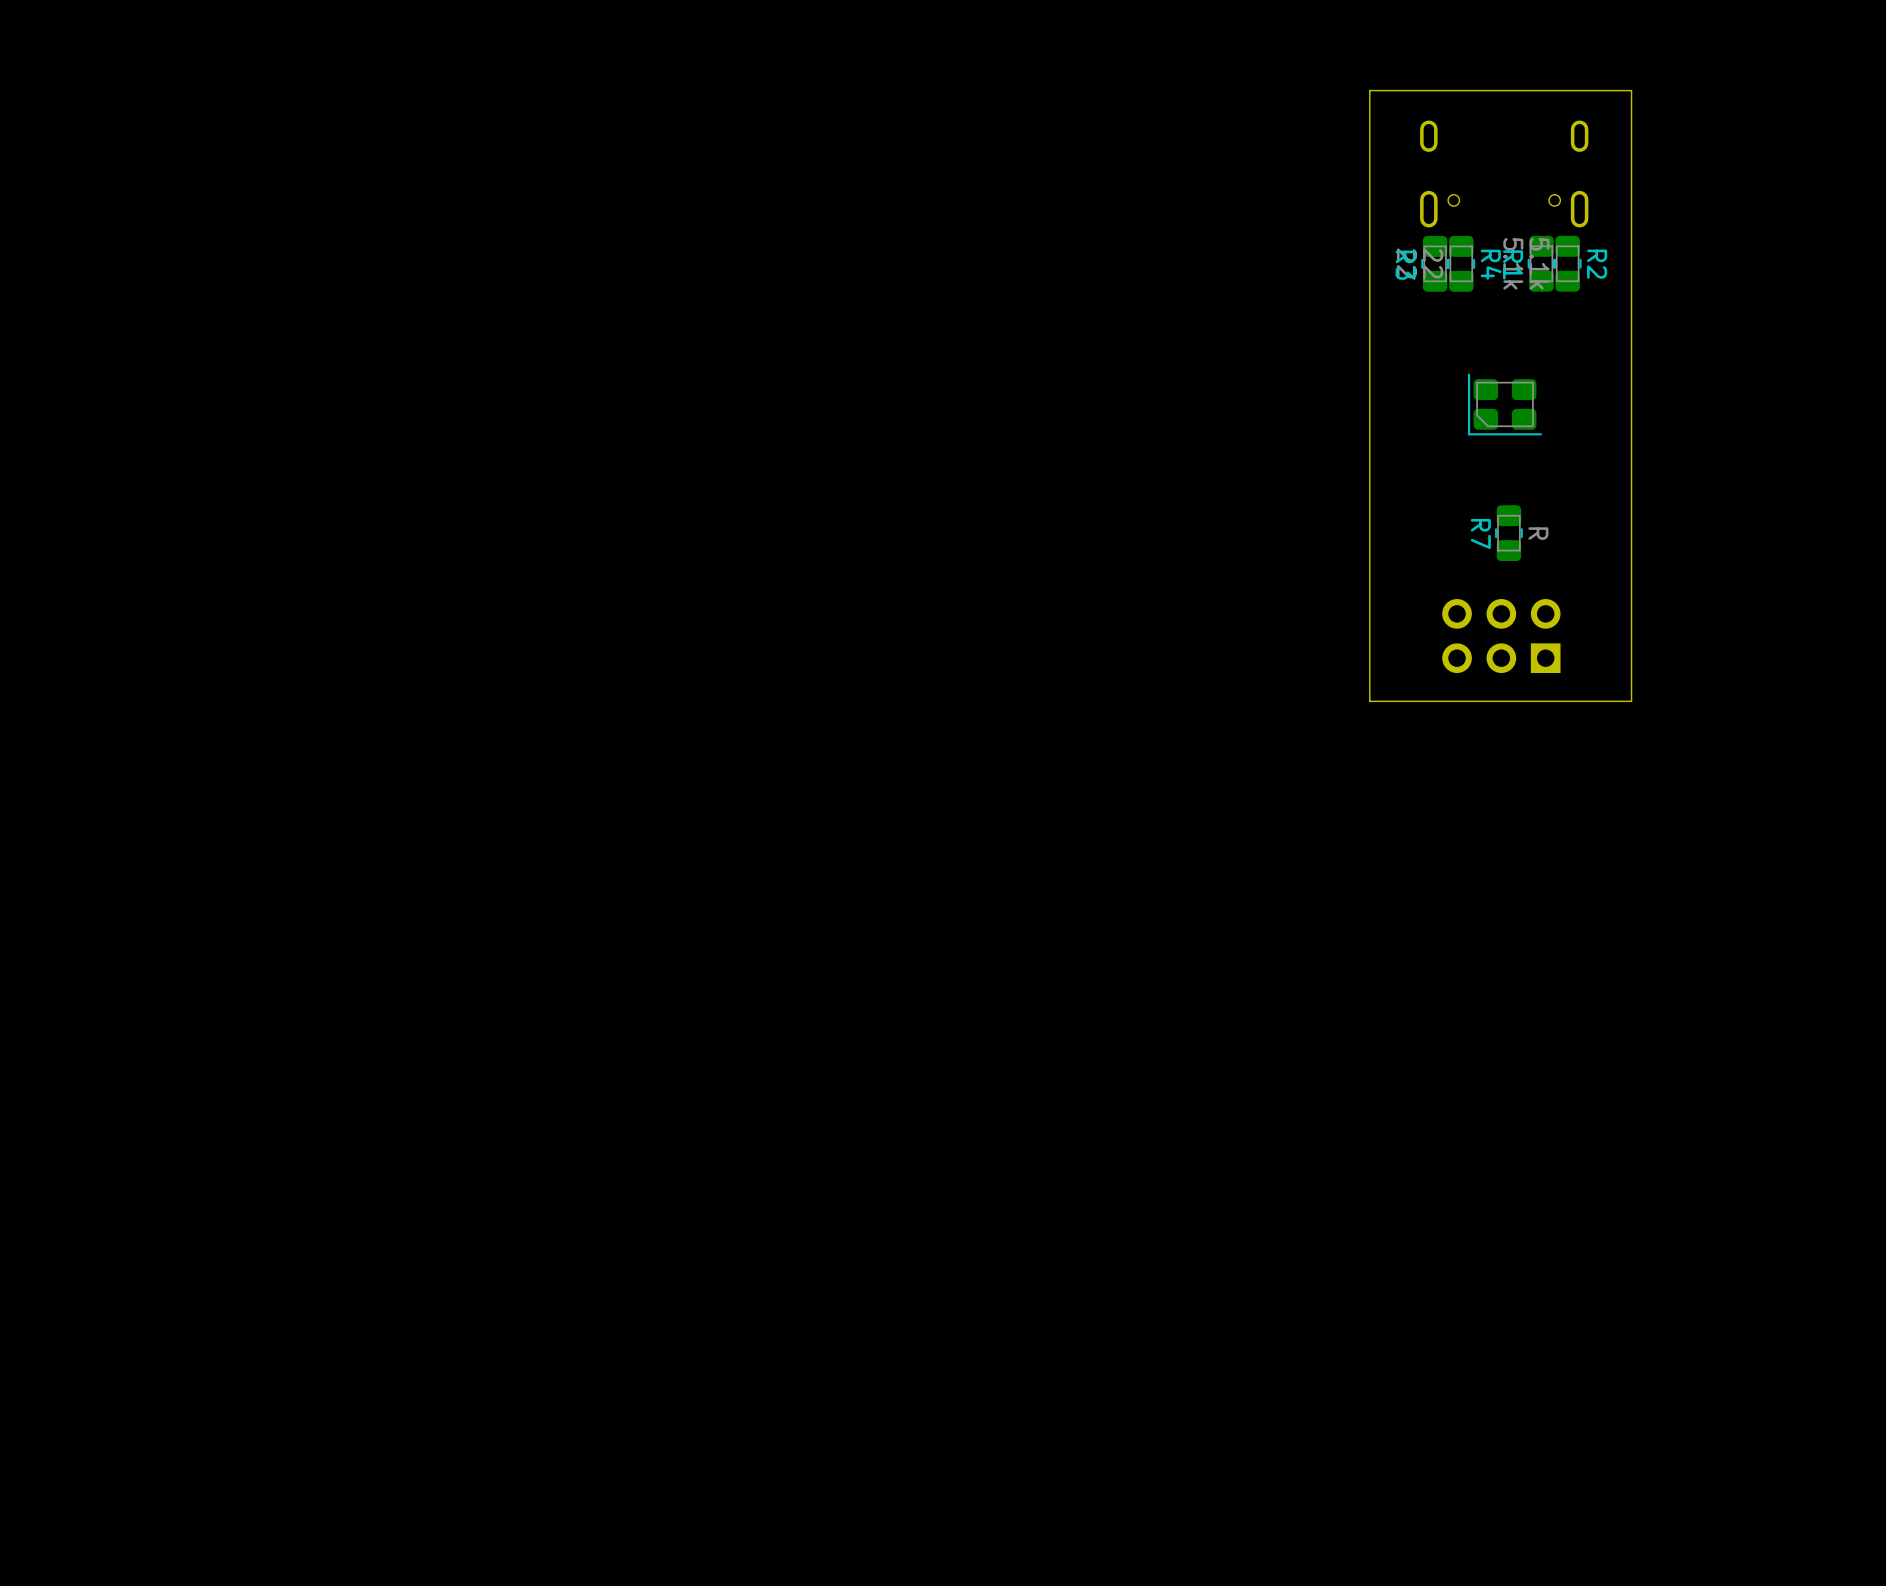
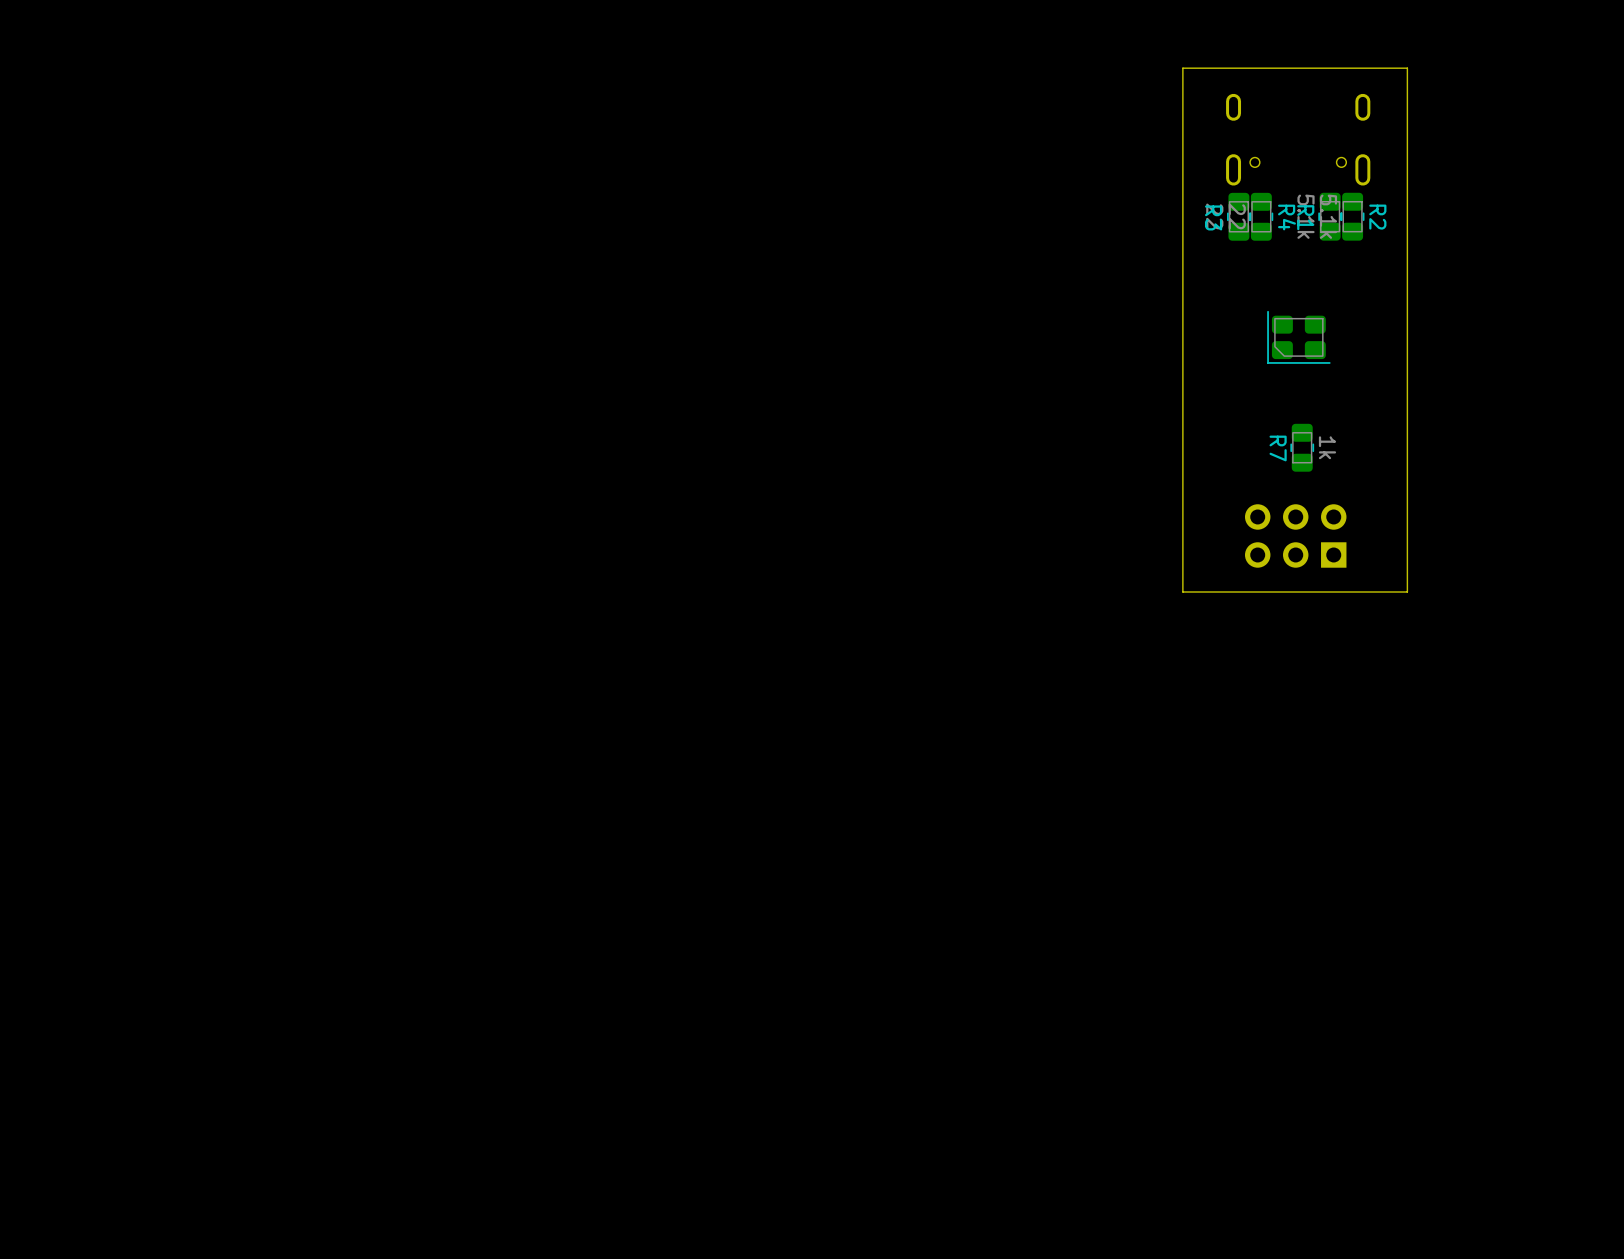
R7 value: R (1538, 533) -> 1k (1327, 447)

